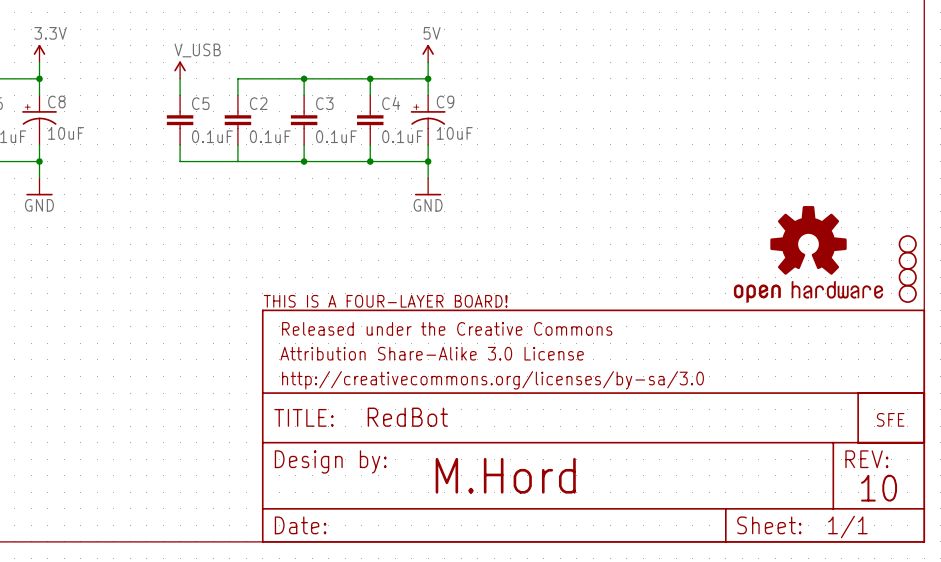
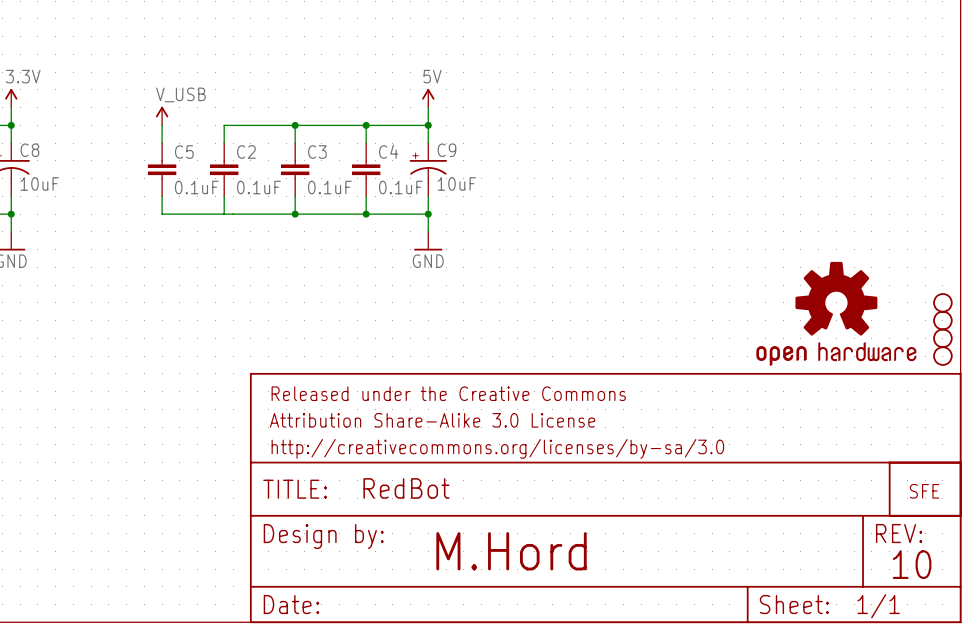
part: (385, 301) -> none

